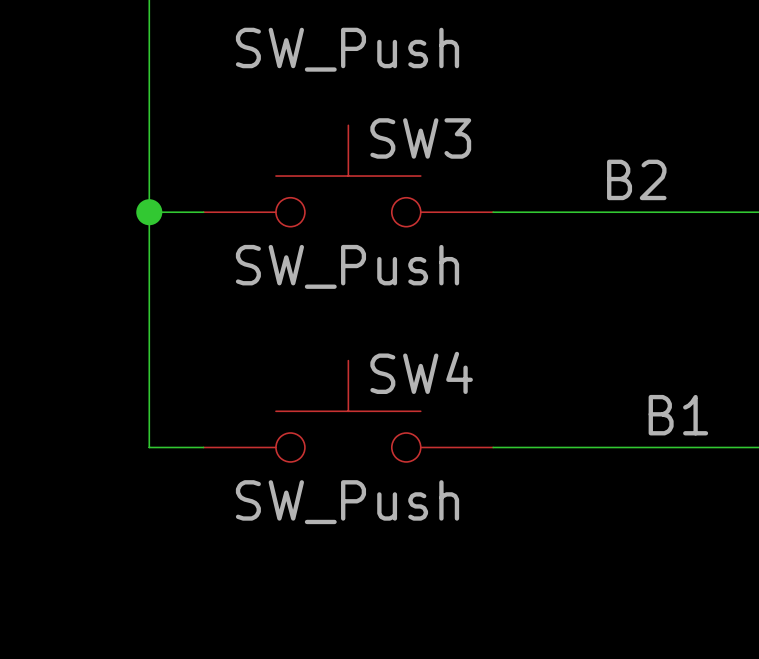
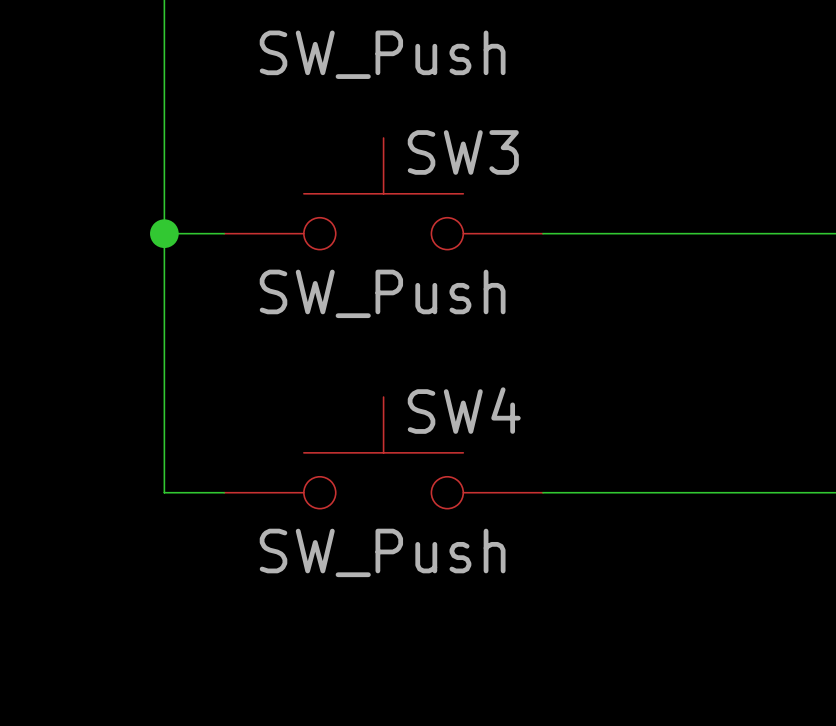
label: B2 (636, 179) -> none
label: B1 (678, 415) -> none

